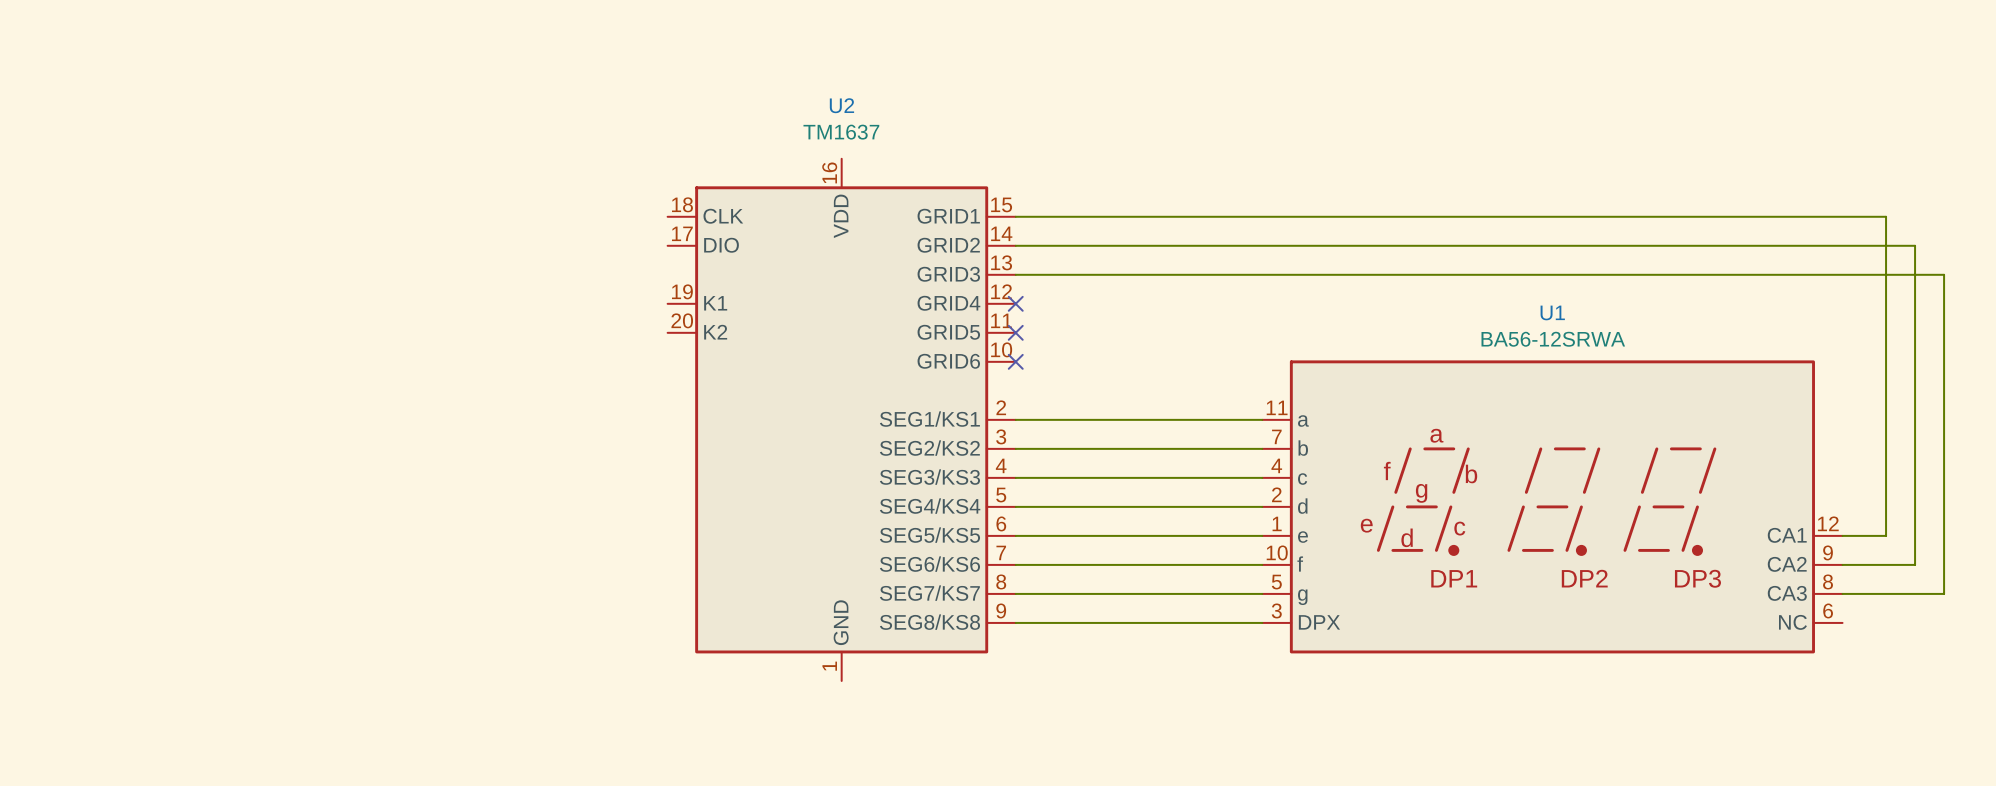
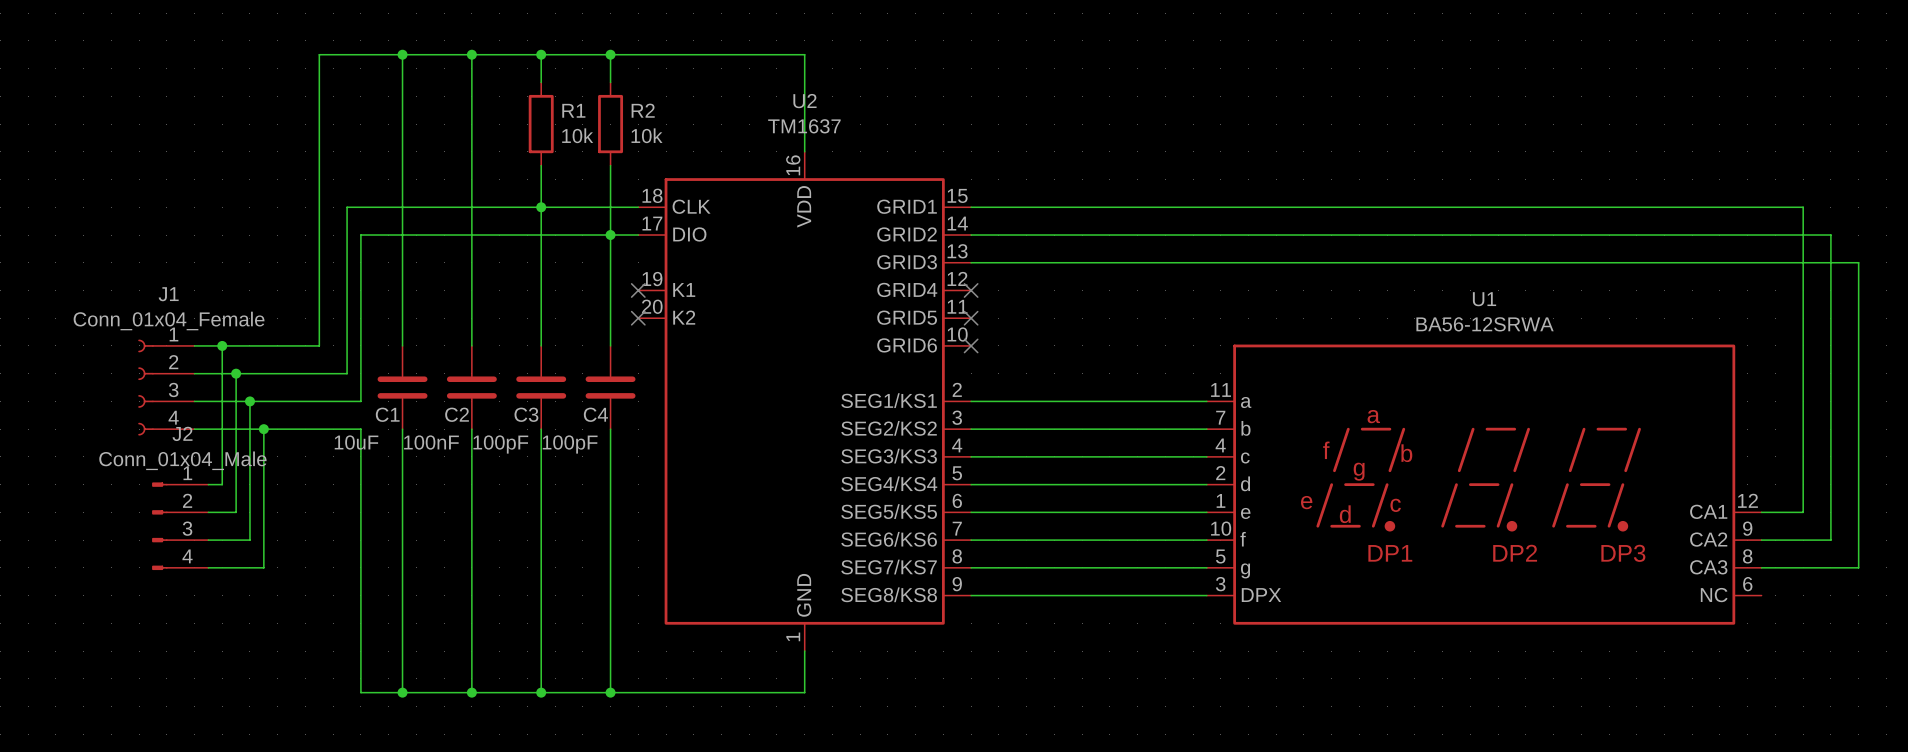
wire: none -> (402, 54) (402, 345)
junction: none -> (402, 54)
wire: none -> (471, 54) (471, 345)
junction: none -> (471, 54)
wire: none -> (541, 54) (541, 82)
junction: none -> (541, 54)
wire: none -> (610, 54) (610, 82)
junction: none -> (610, 54)
R1: none -> 10k (541, 124)
R2: none -> 10k (610, 124)
wire: none -> (804, 151) (804, 54) (319, 54) (319, 345) (194, 345)
wire: none -> (541, 165) (541, 345)
wire: none -> (610, 165) (610, 345)
junction: none -> (541, 207)
wire: none -> (638, 207) (347, 207) (347, 373) (194, 373)
junction: none -> (610, 235)
wire: none -> (638, 235) (360, 235) (360, 401) (194, 401)
no-connect mark: none -> (638, 290)
no-connect mark: none -> (638, 318)
wire: none -> (222, 345) (222, 484) (208, 484)
junction: none -> (222, 345)
wire: none -> (236, 373) (236, 512) (208, 512)
junction: none -> (236, 373)
J1: none -> Conn_01x04_Female (166, 387)
C1: none -> 10uF (402, 387)
C2: none -> 100nF (471, 387)
C3: none -> 100pF (541, 387)
C4: none -> 100pF (610, 387)
wire: none -> (249, 401) (249, 540) (208, 540)
junction: none -> (249, 401)
wire: none -> (194, 429) (360, 429) (360, 692) (804, 692) (804, 651)
wire: none -> (263, 429) (263, 567) (208, 567)
junction: none -> (263, 429)
wire: none -> (402, 429) (402, 692)
wire: none -> (471, 429) (471, 692)
wire: none -> (541, 429) (541, 692)
wire: none -> (610, 429) (610, 692)
J2: none -> Conn_01x04_Male (180, 526)
junction: none -> (402, 692)
junction: none -> (471, 692)
junction: none -> (541, 692)
junction: none -> (610, 692)

